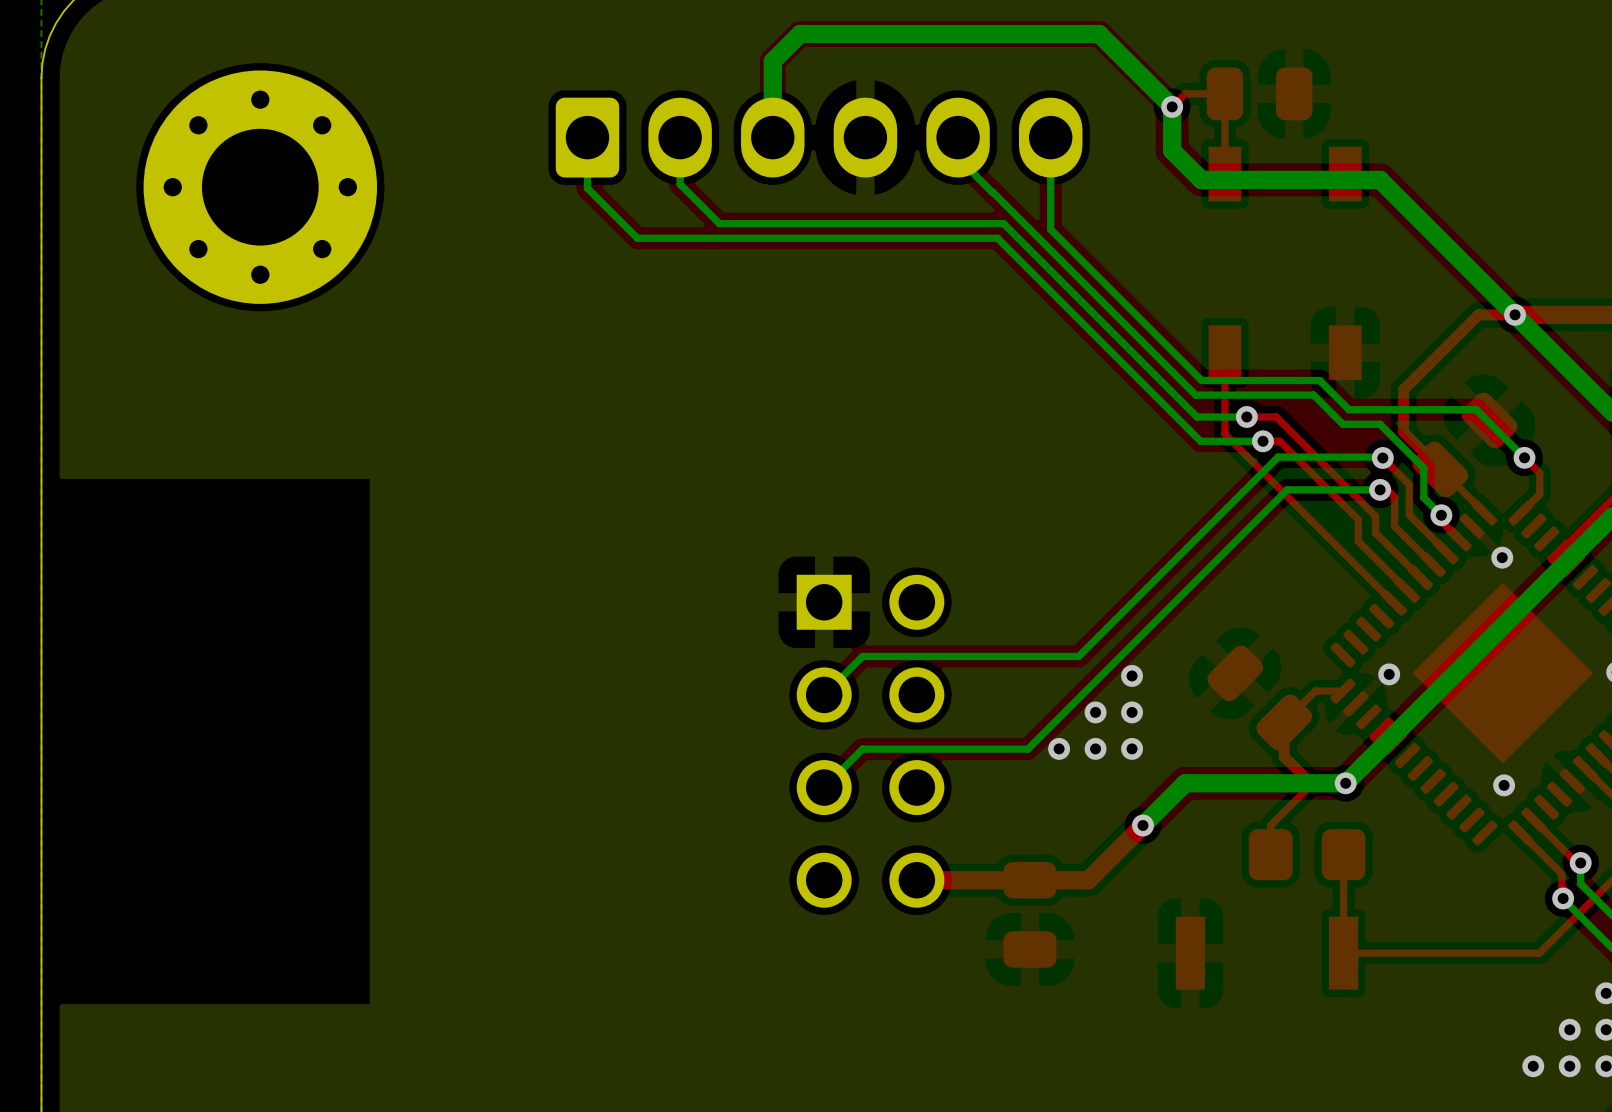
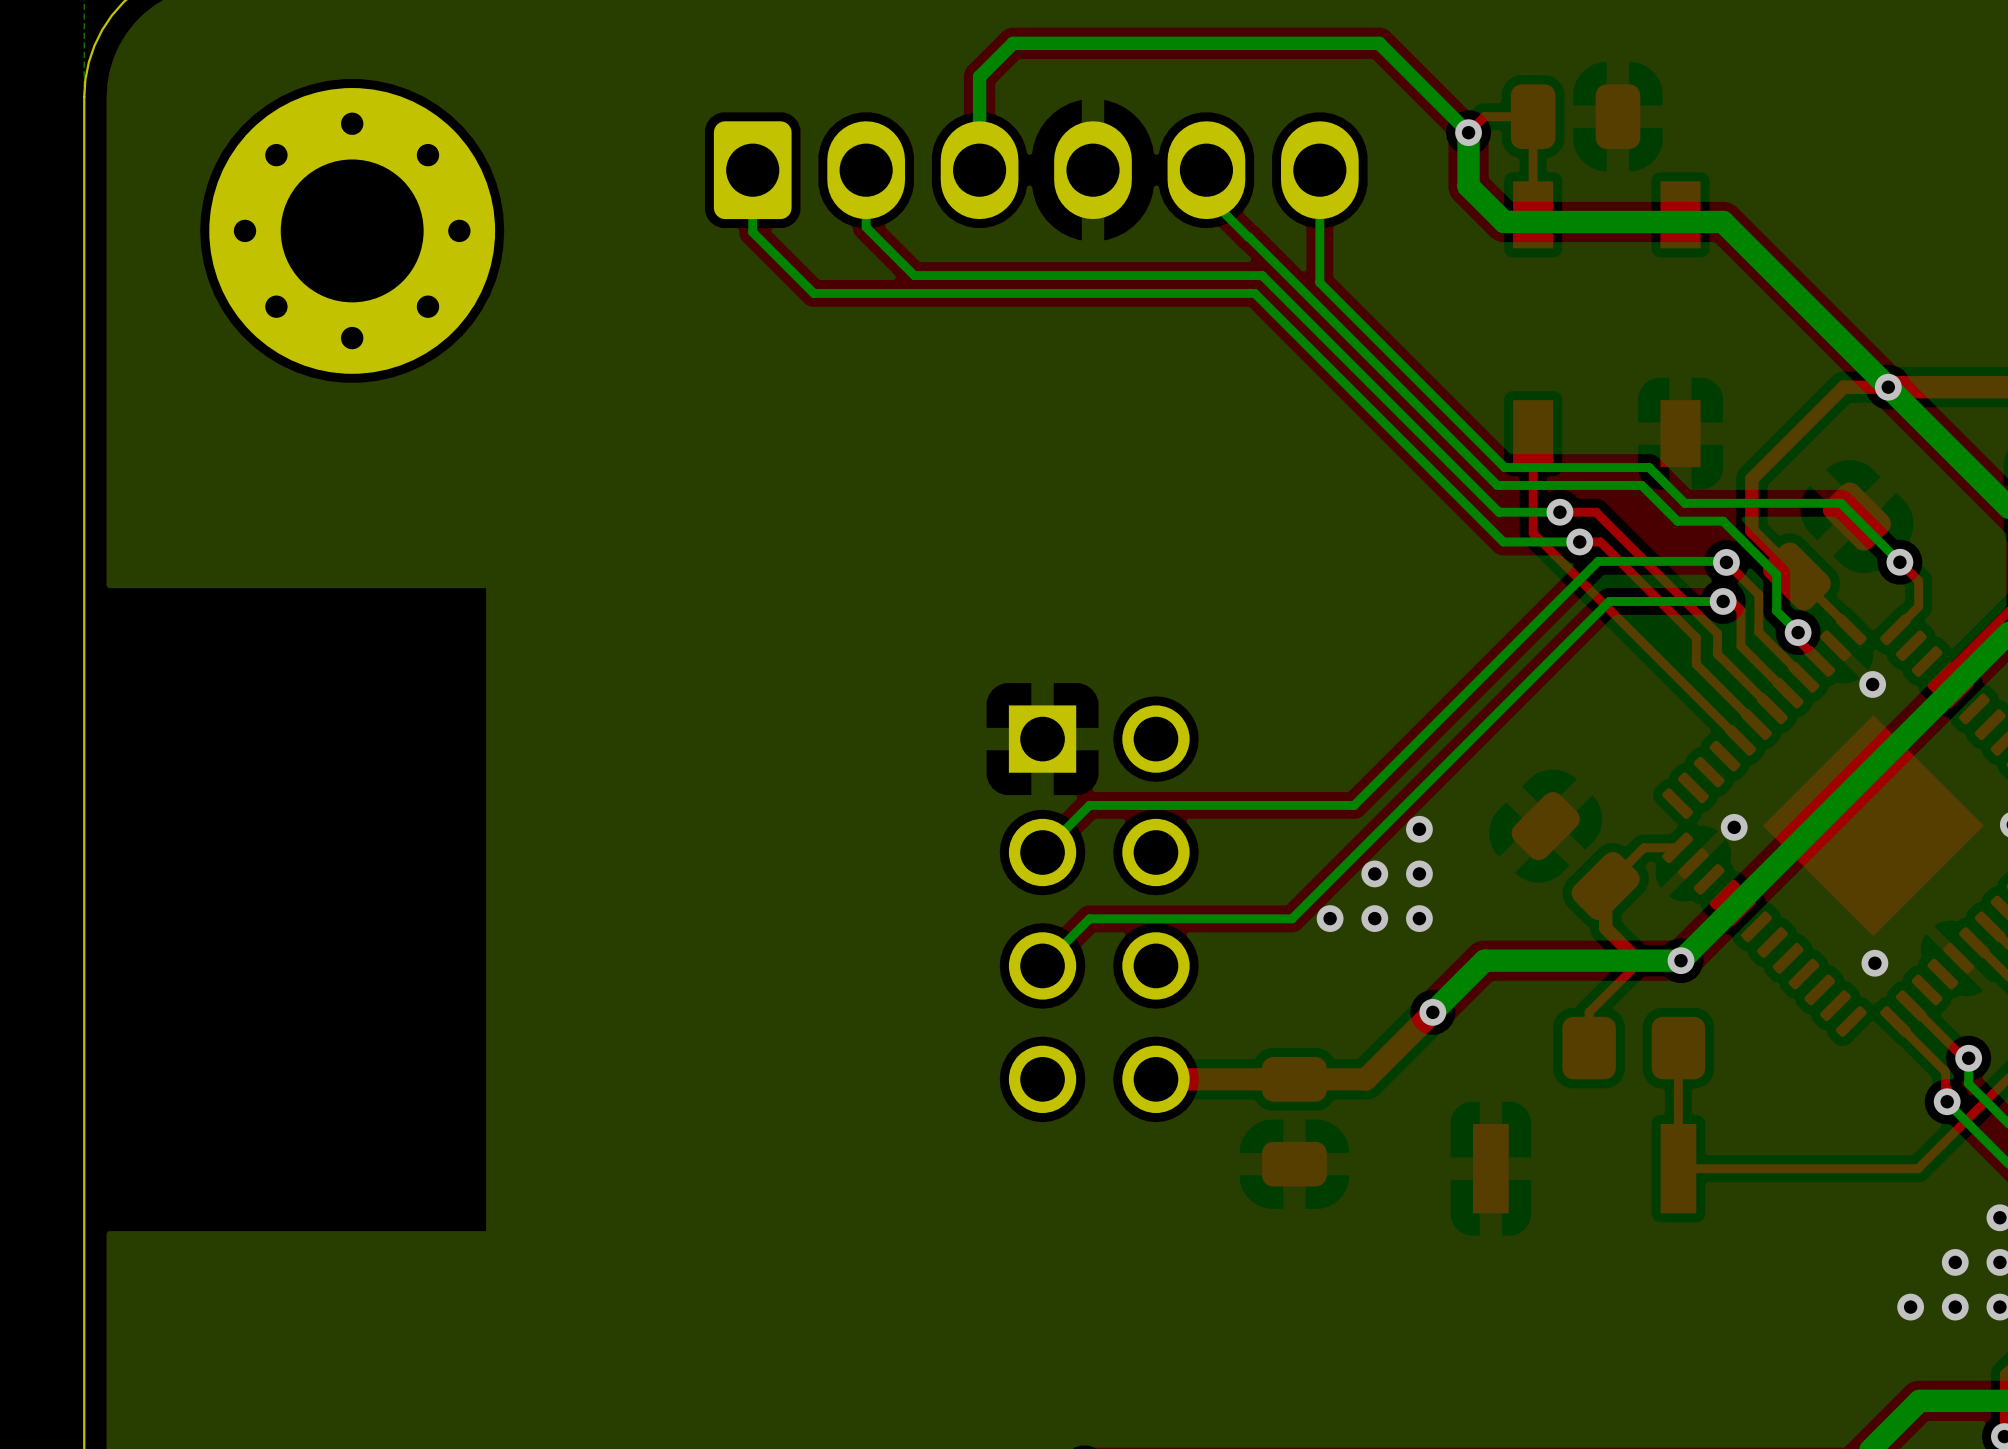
bottom track width: thick (1172, 106) (1099, 34) (800, 34) (772, 61) (772, 137) -> thin (1468, 132) (1379, 43) (1013, 43) (979, 76) (979, 170)

